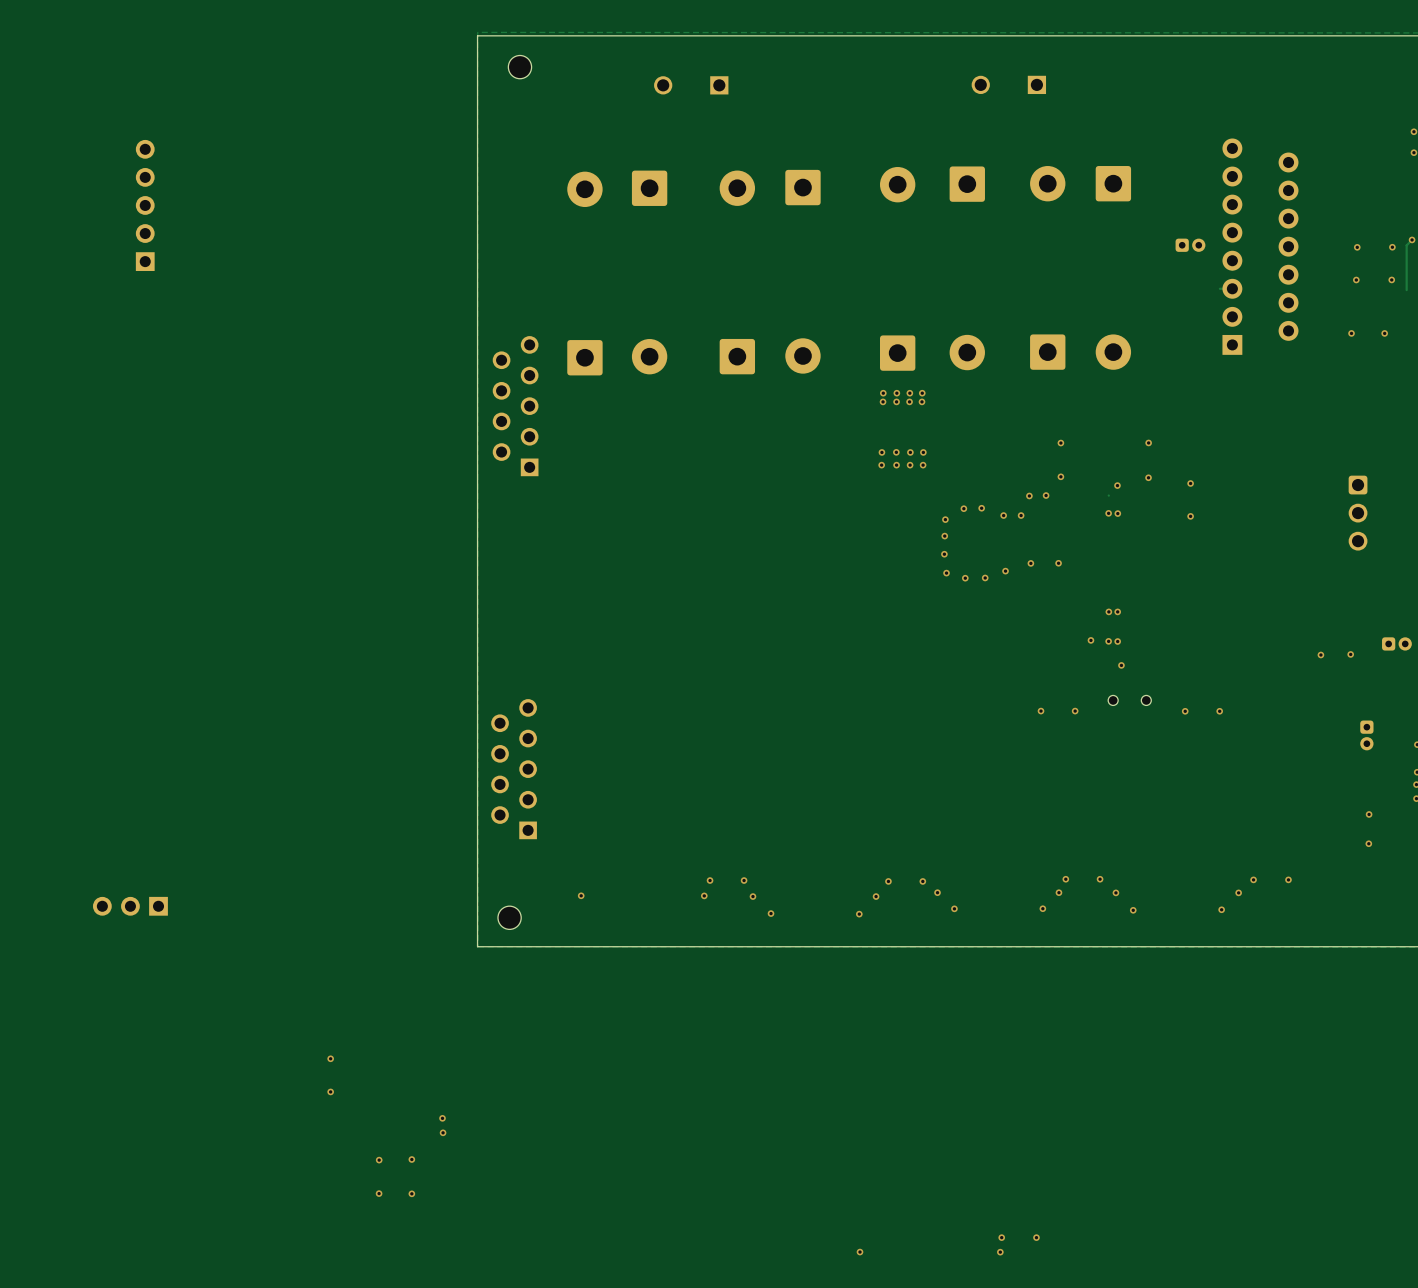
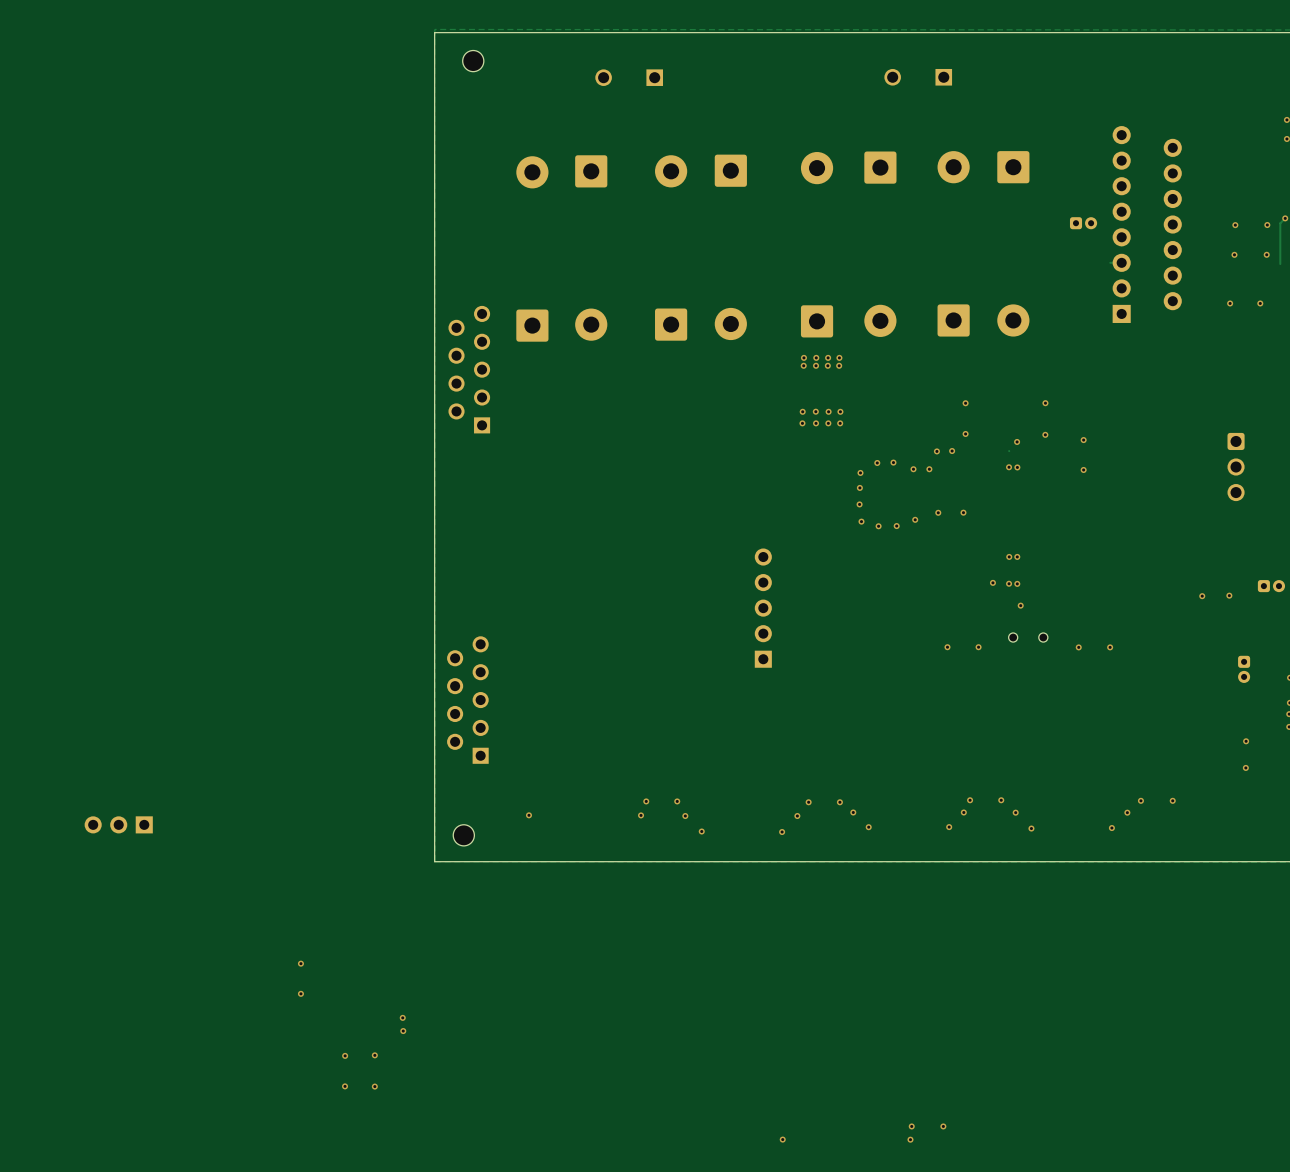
part: (145, 205) -> none
part: none -> (763, 608)

